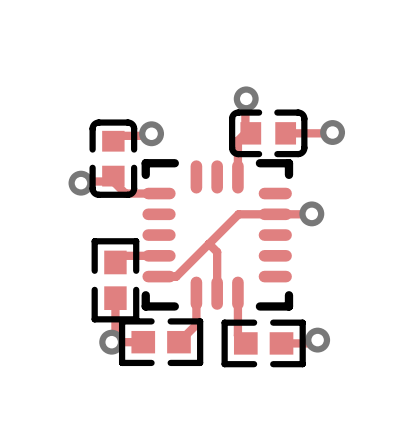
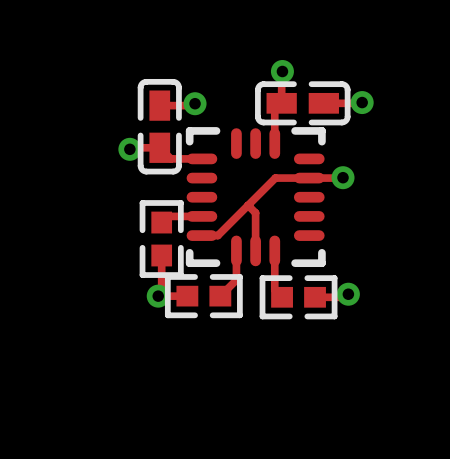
part footprint: [228, 109, 308, 158] -> [255, 81, 351, 126]
part footprint: [89, 119, 138, 198] -> [137, 78, 182, 175]

